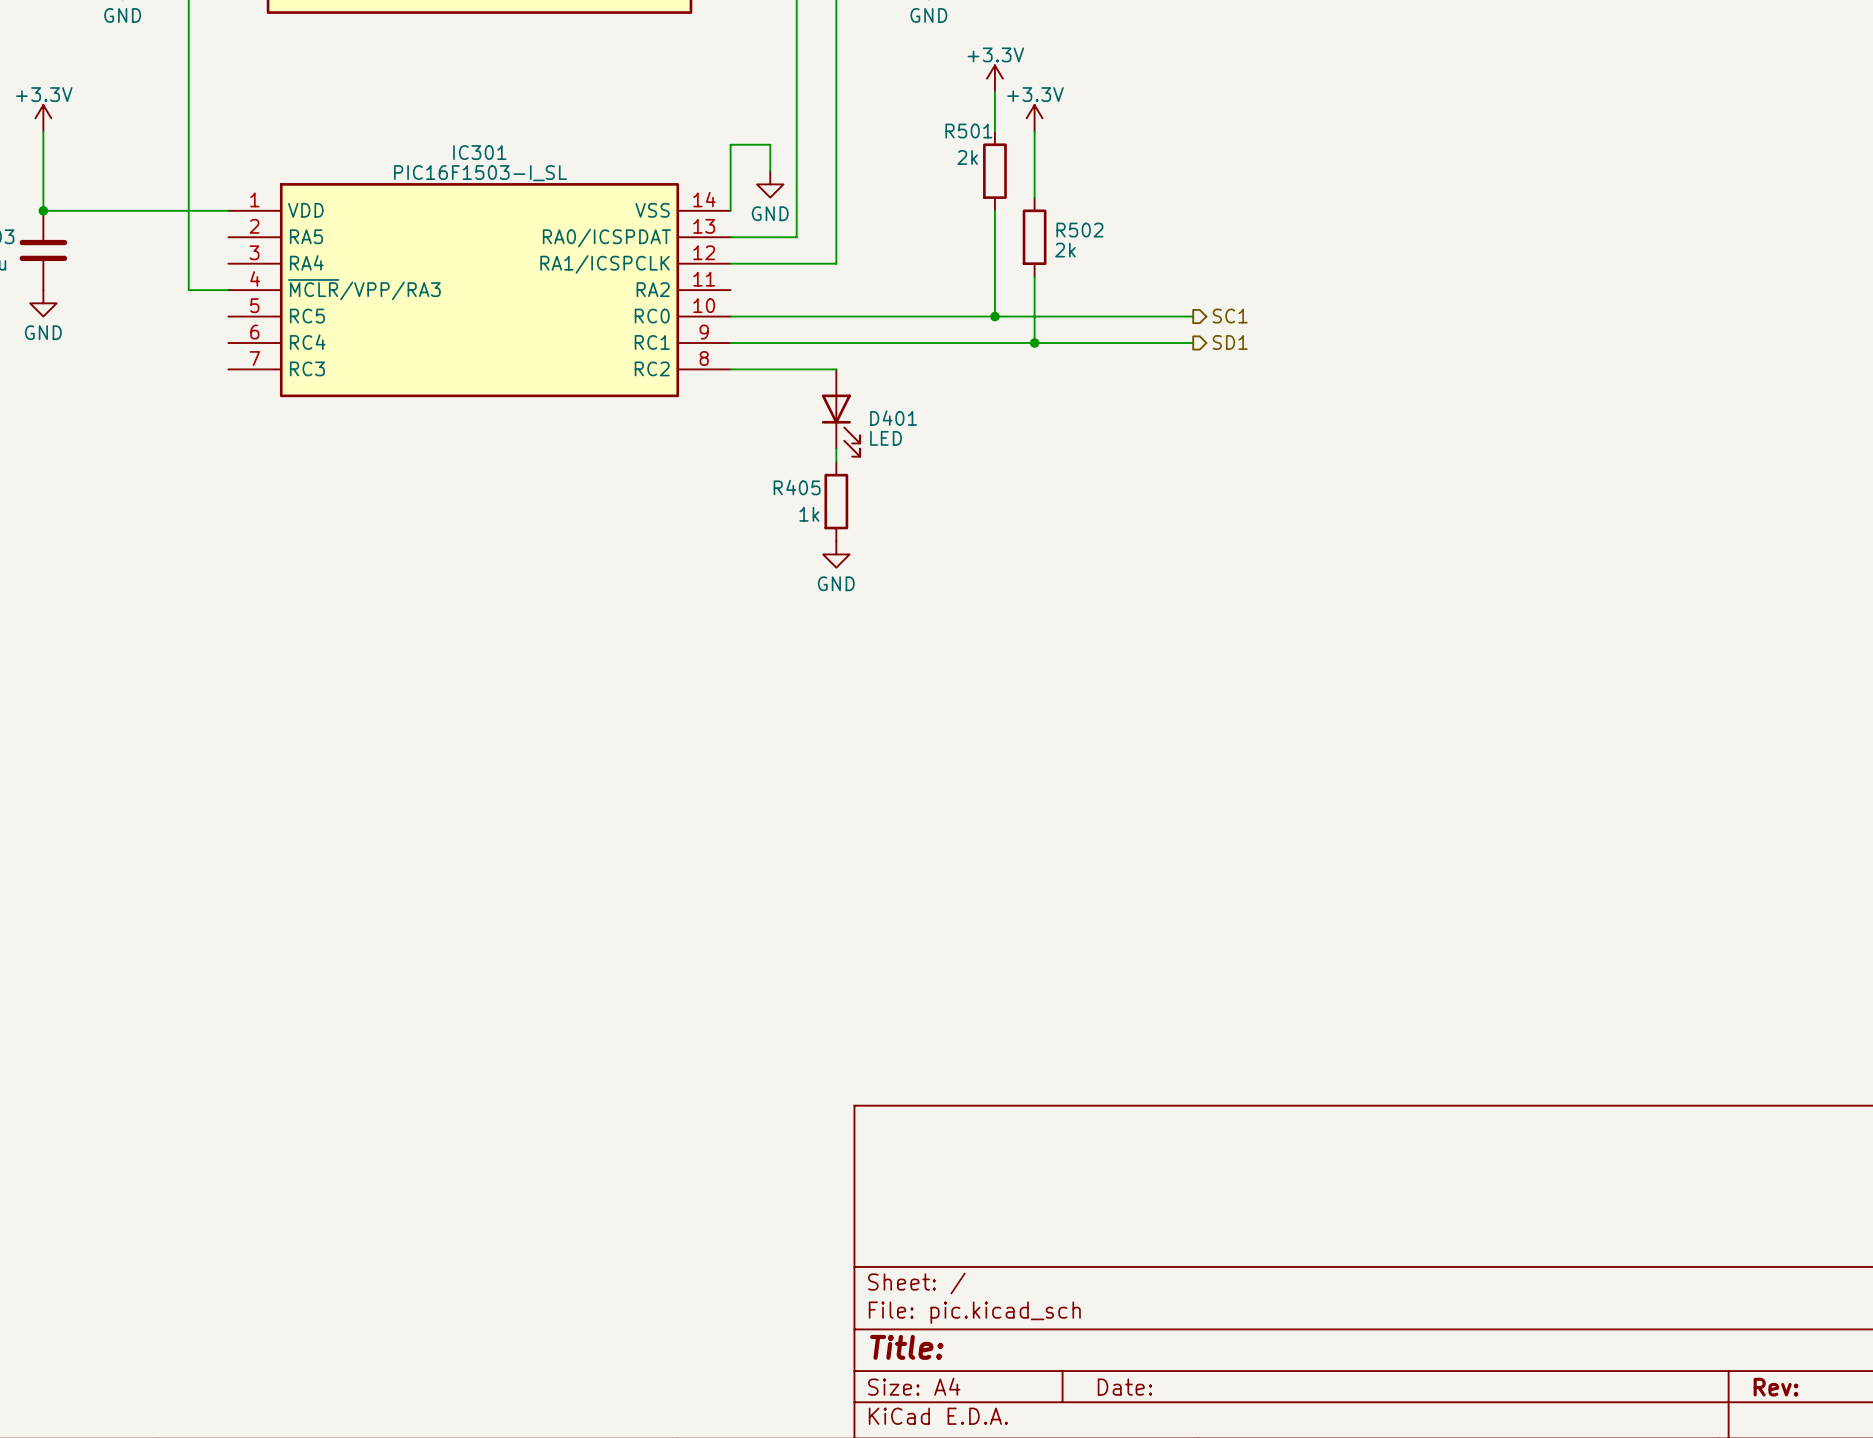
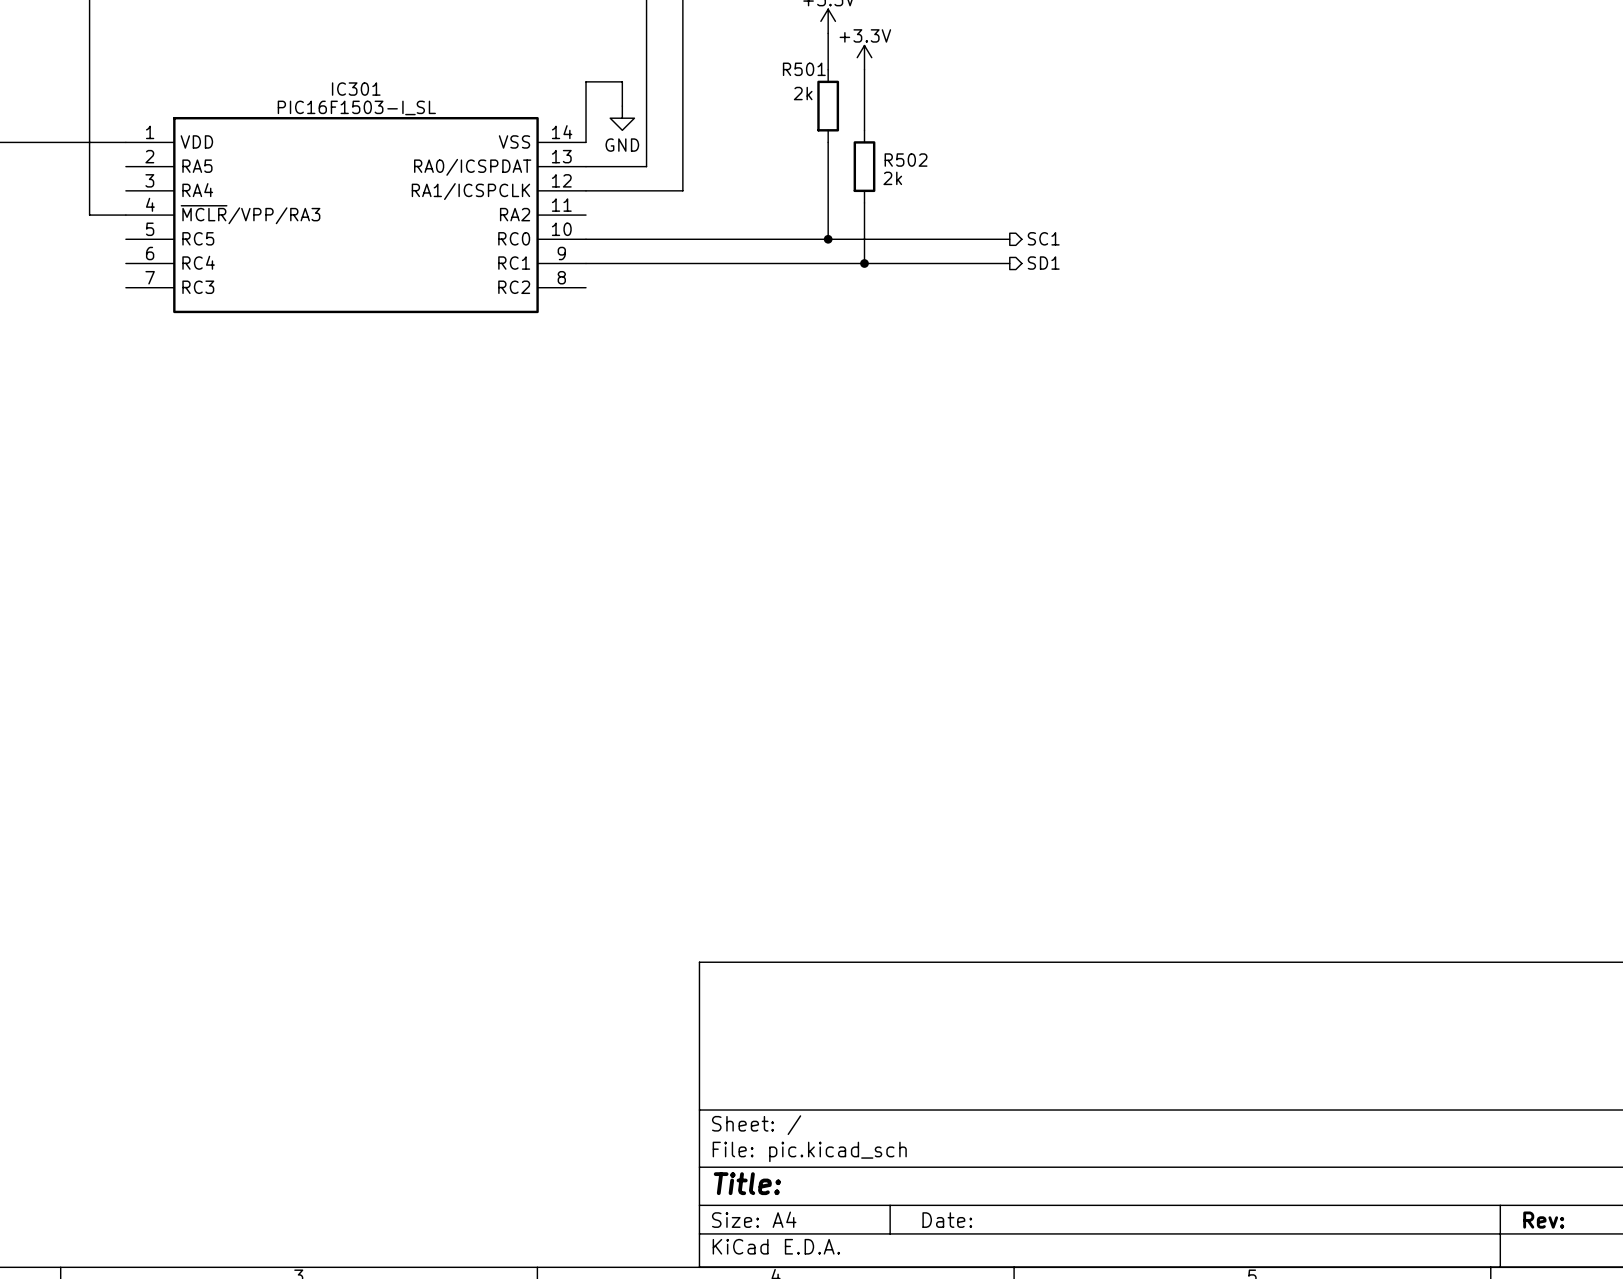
wire: (730, 369) (836, 369) -> none
D401: LED (840, 413) -> none
wire: (836, 448) (836, 461) -> none
R405: 1k (836, 501) -> none
power symbol: GND (836, 554) -> none

